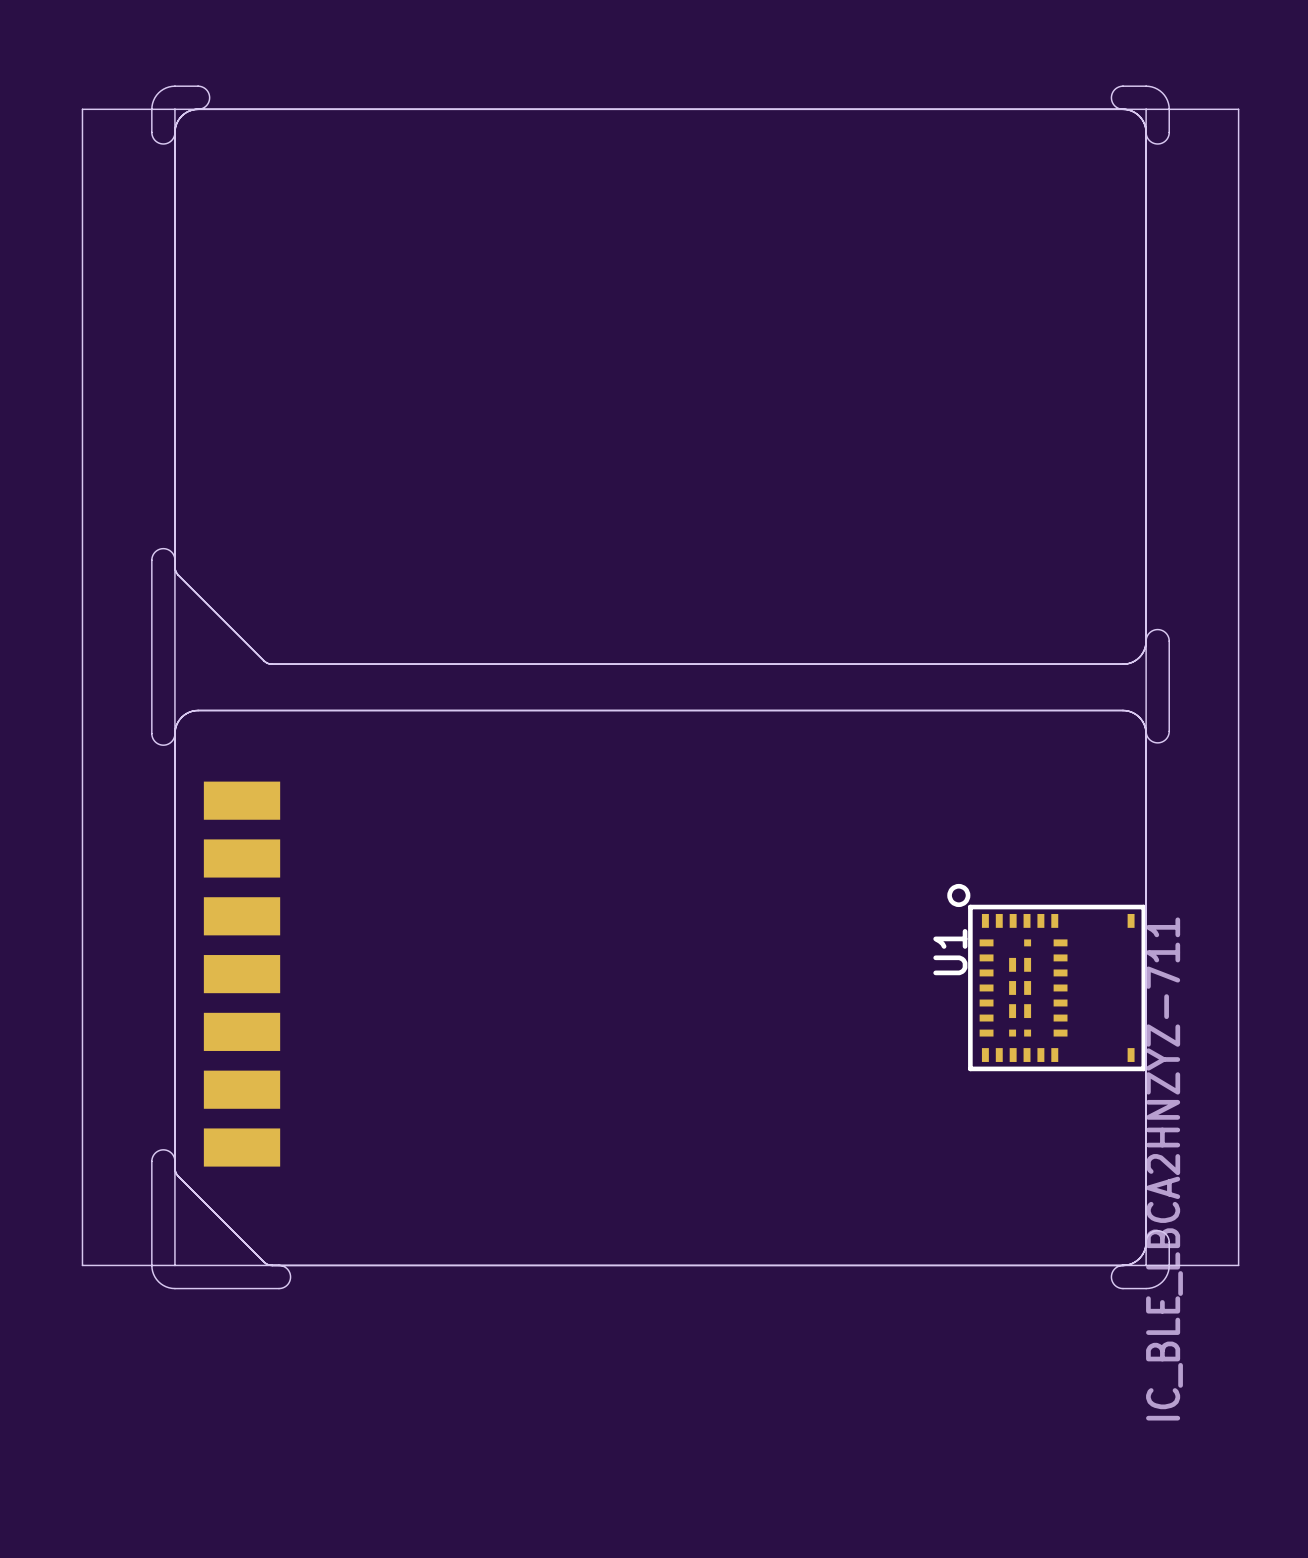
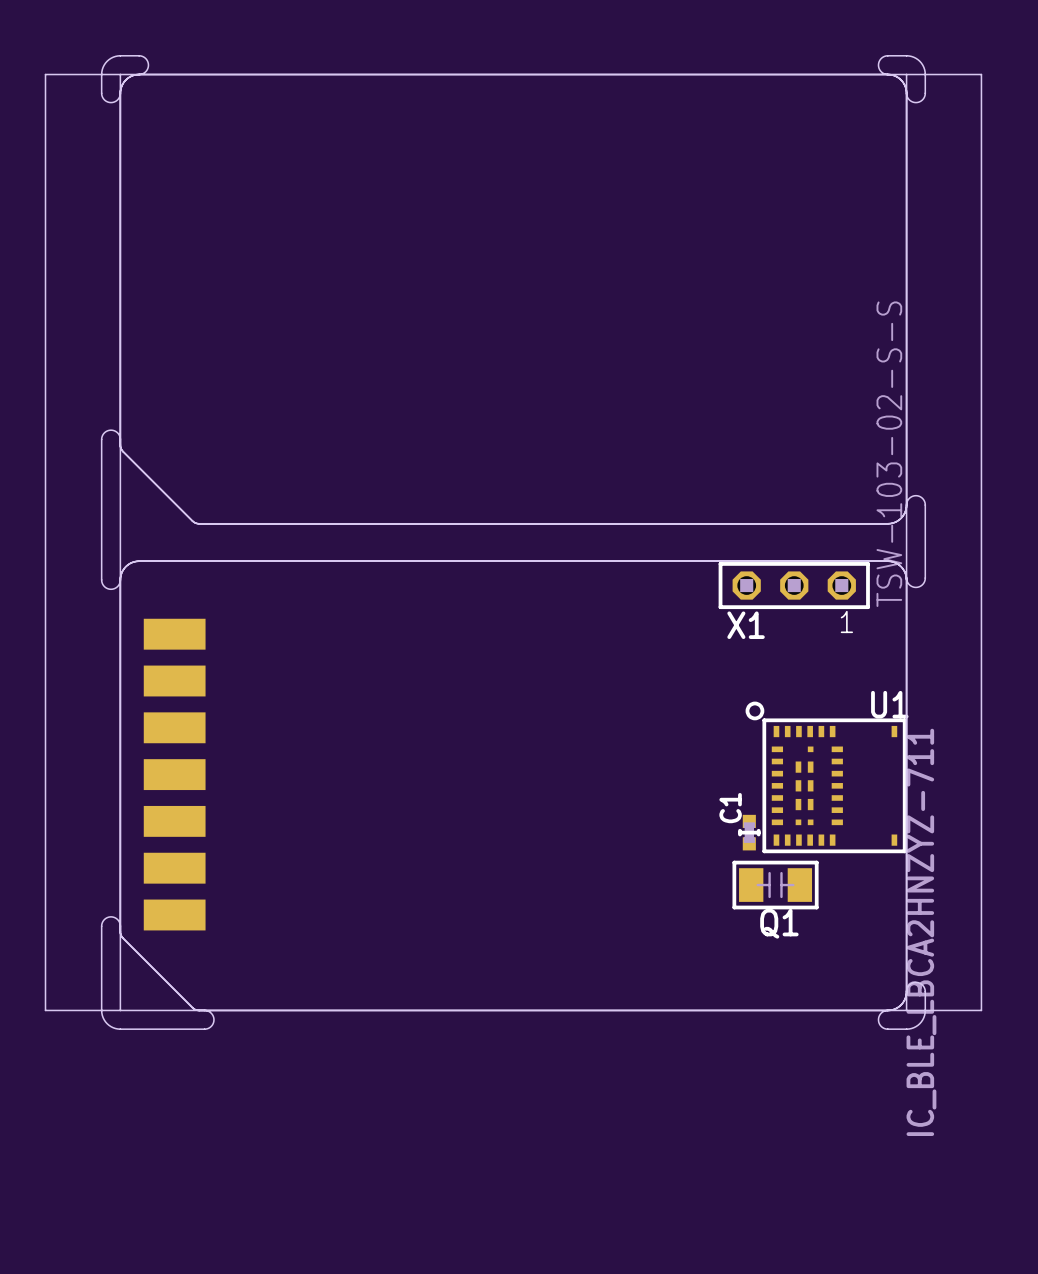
X1: none -> TSW-103-02-S-S (794, 585)
U1 name rotation: 0° (950, 952) -> 90° clockwise (889, 704)
U1 name position: U1 (950, 952) -> U1 (889, 704)
C1: none -> (749, 832)
Q1: none -> (775, 885)

